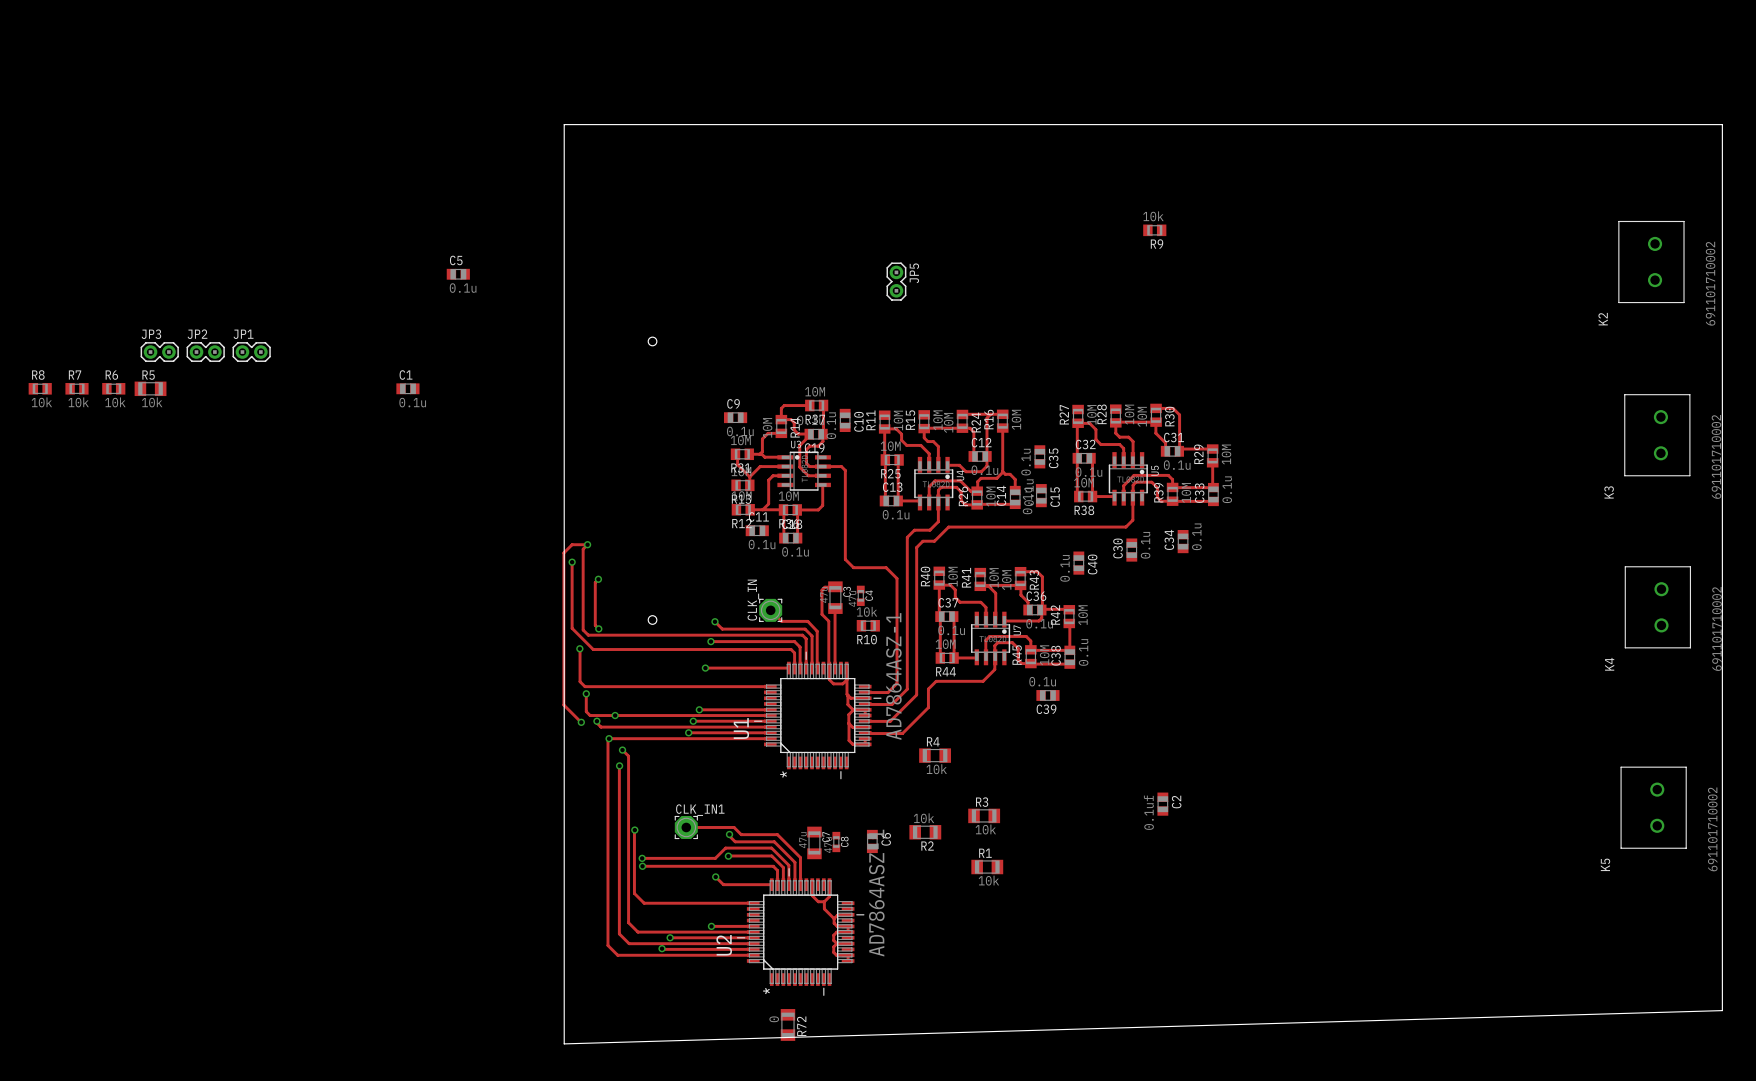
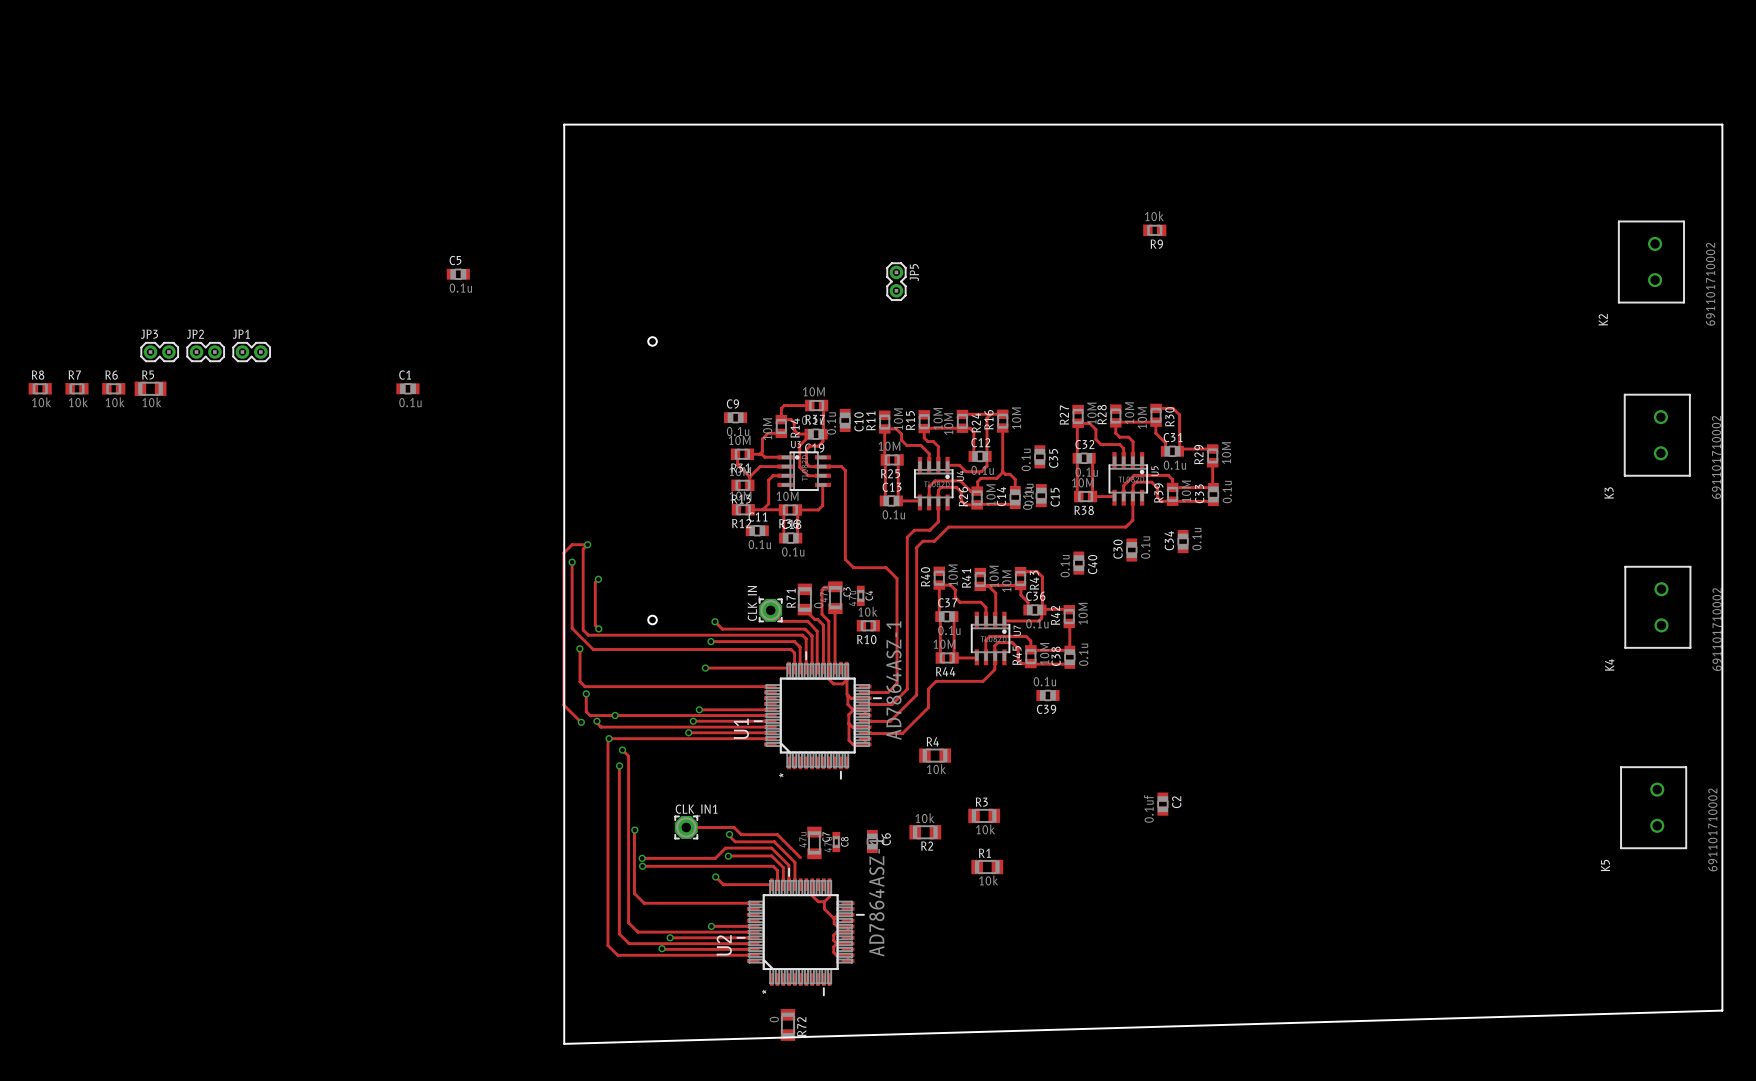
R71: none -> 0 (804, 599)
track: none -> (804, 609) (823, 625) (823, 668)
track: (800, 857) (800, 884) -> none

